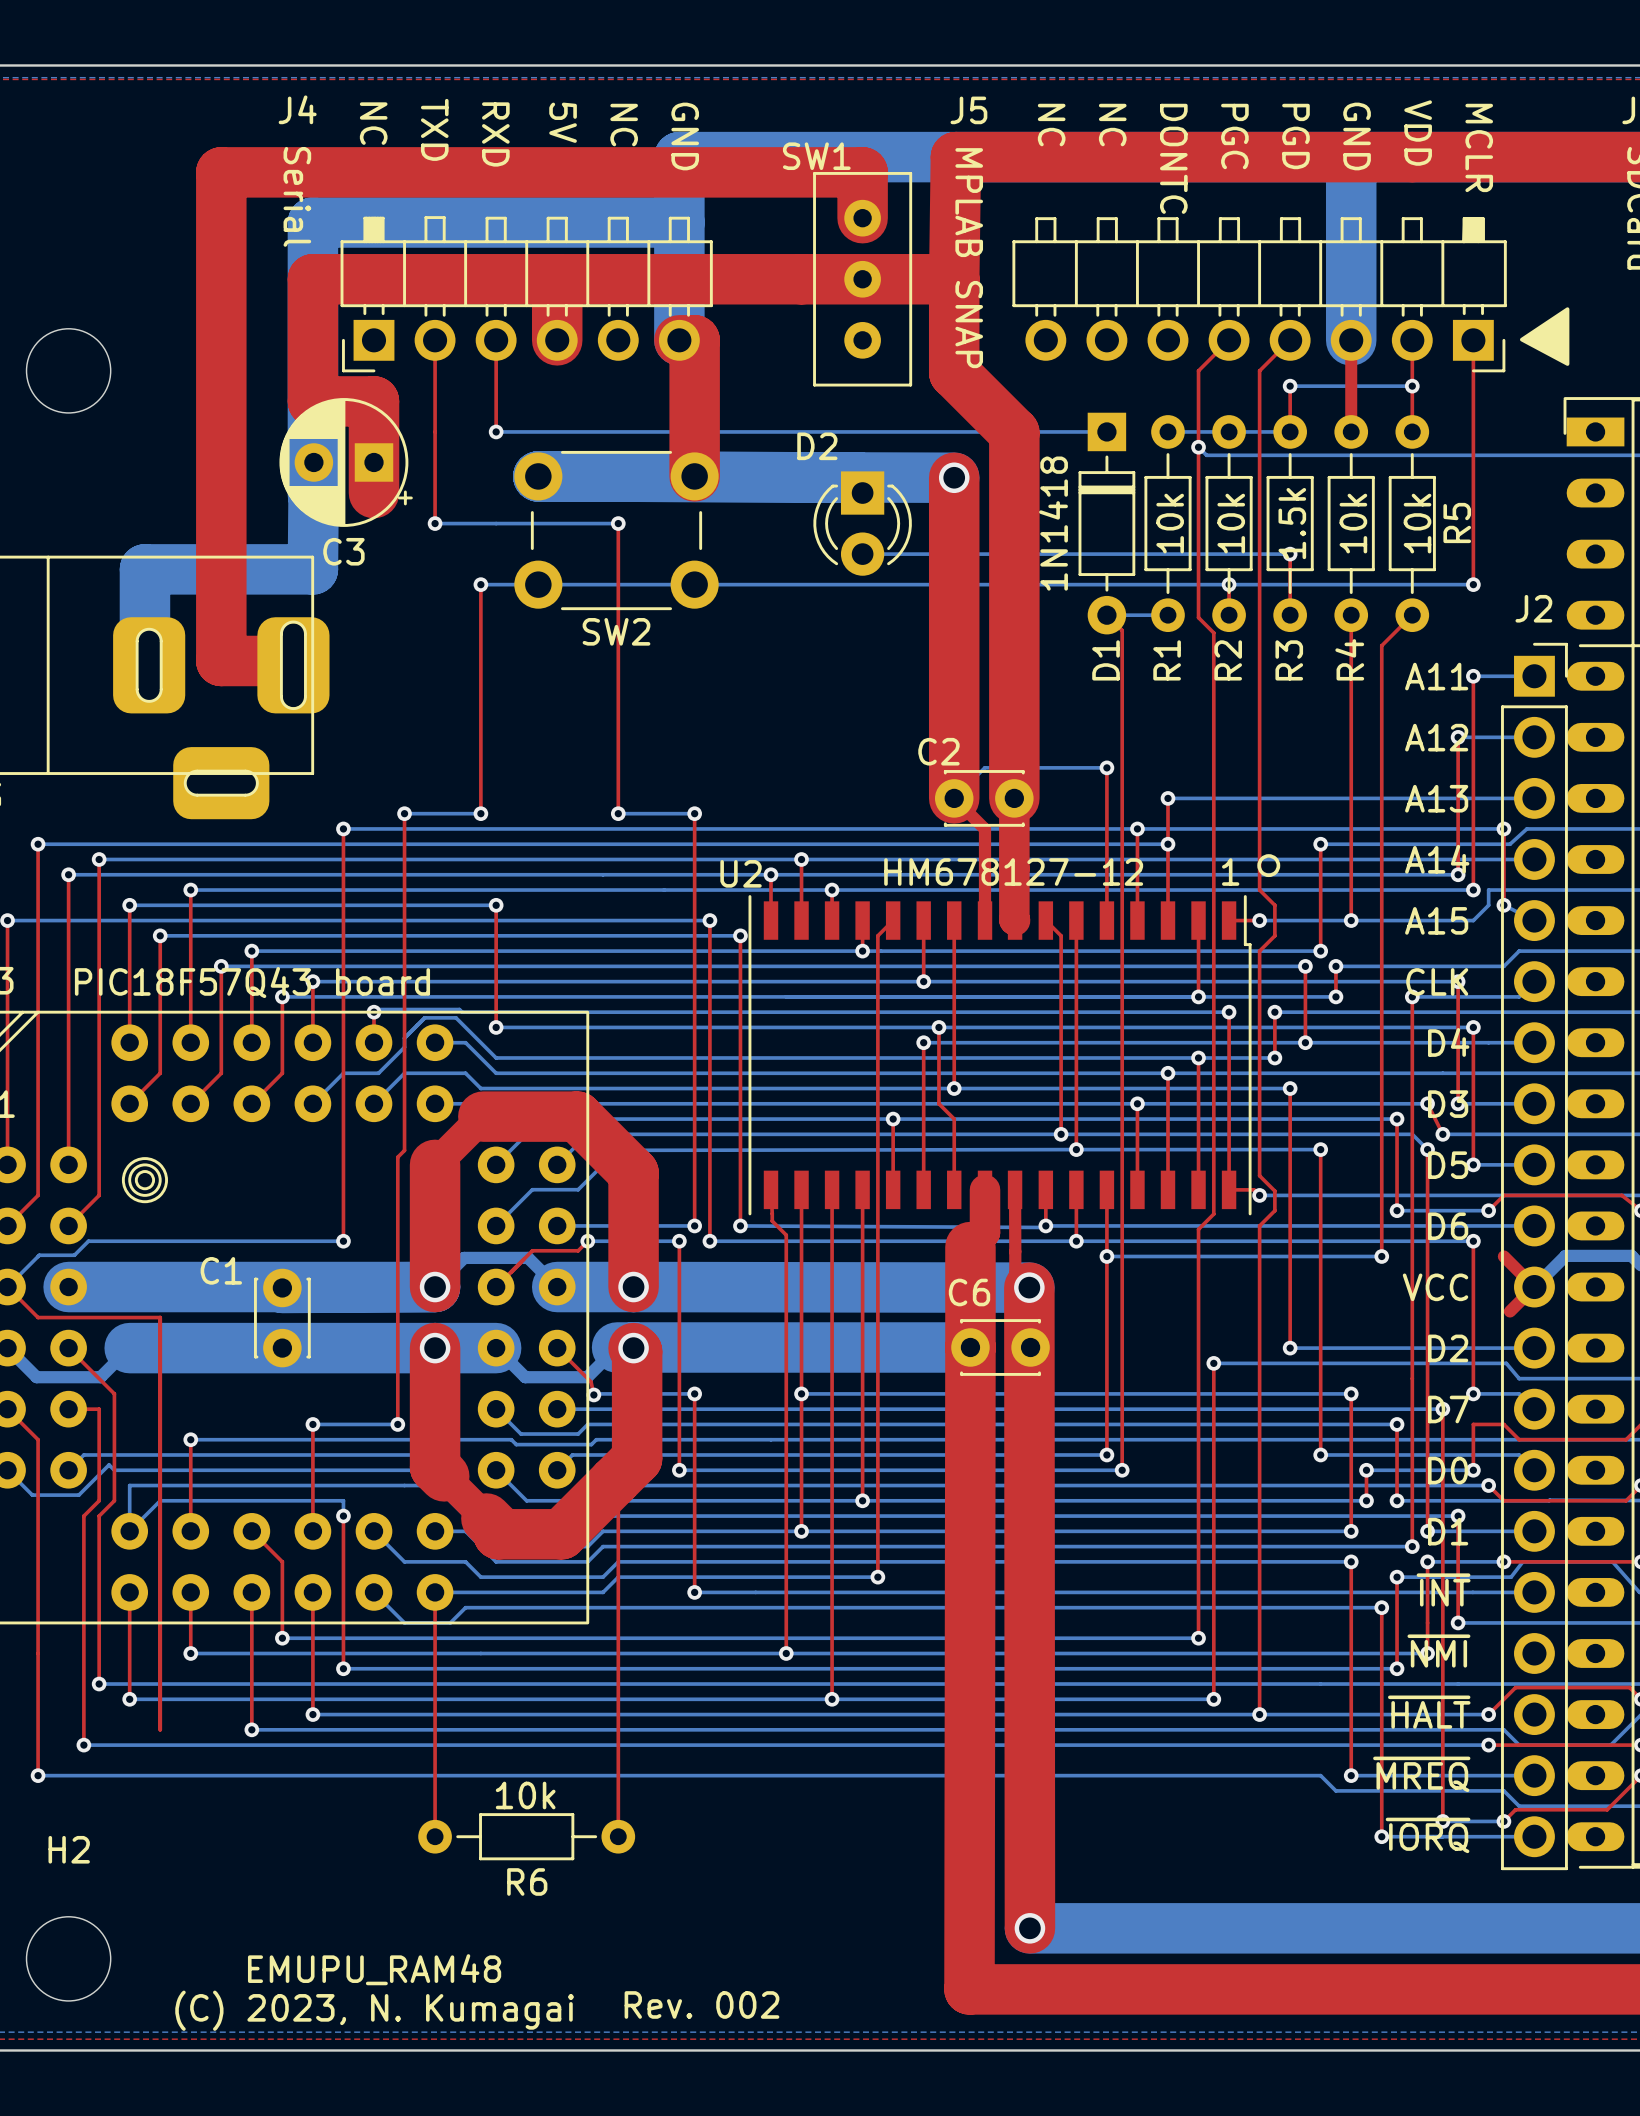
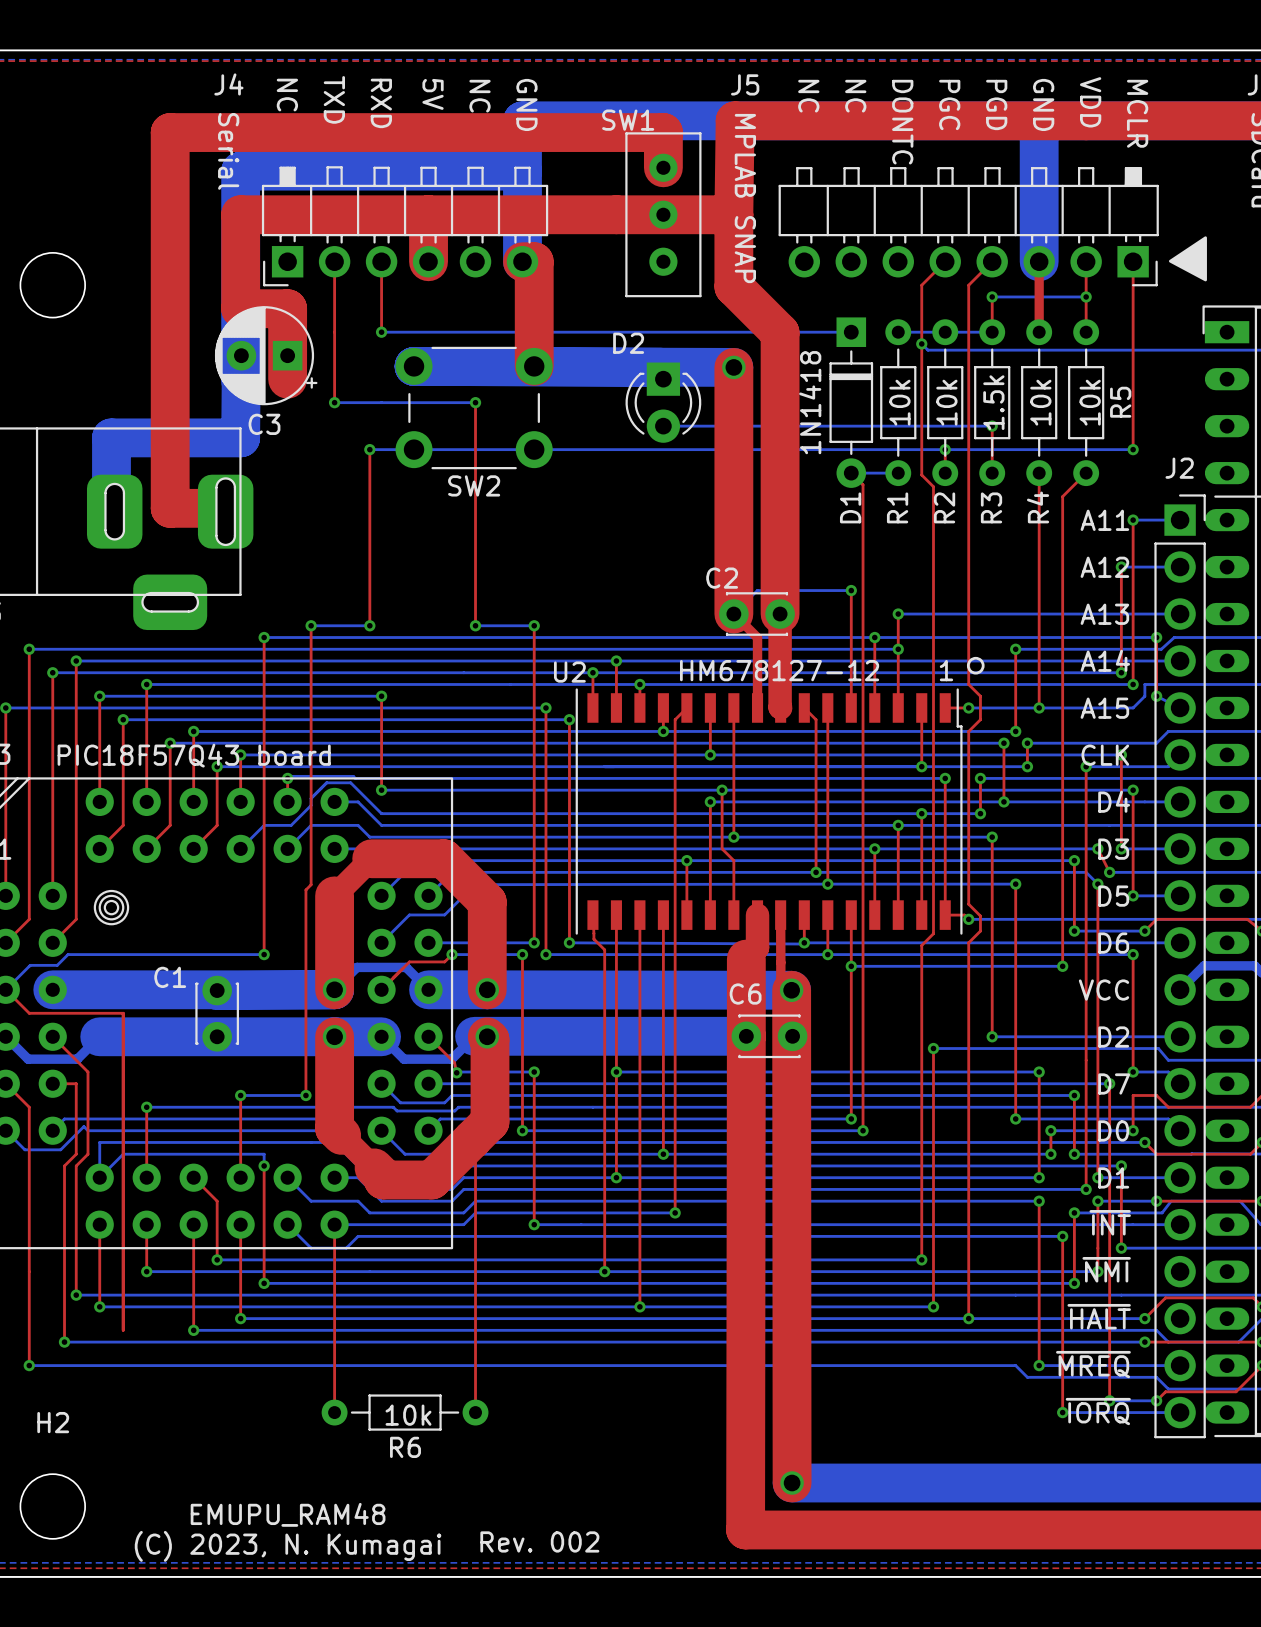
top track: (1503, 1256) (1534, 1287) -> none
top track: (1534, 1287) (1510, 1311) (1503, 1311) -> none
text position: 10k (525, 1795) -> 10k (408, 1415)

